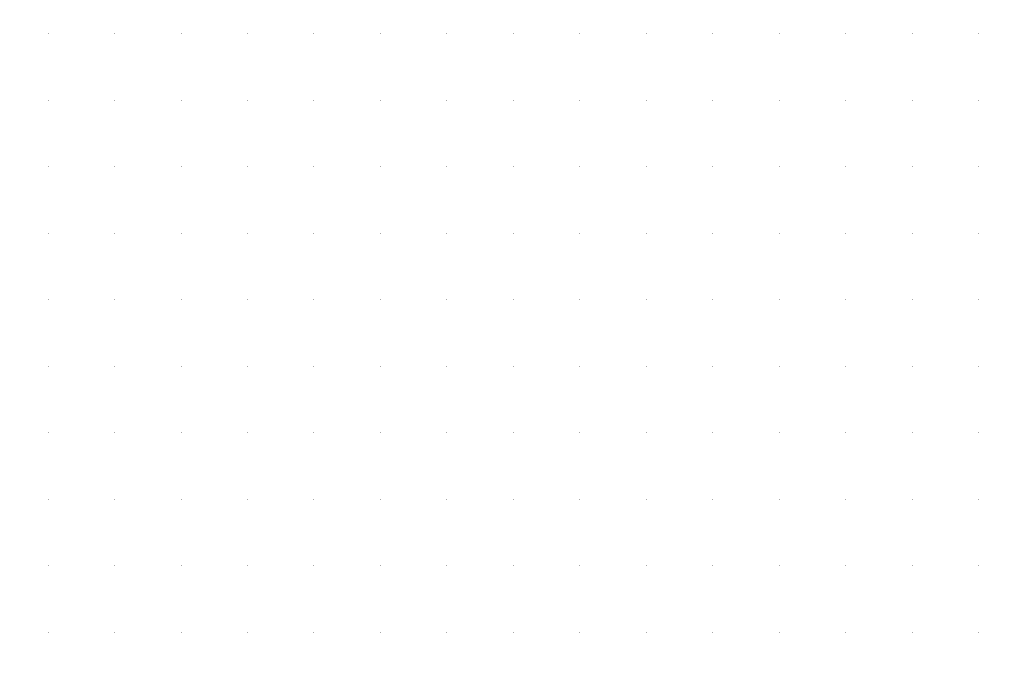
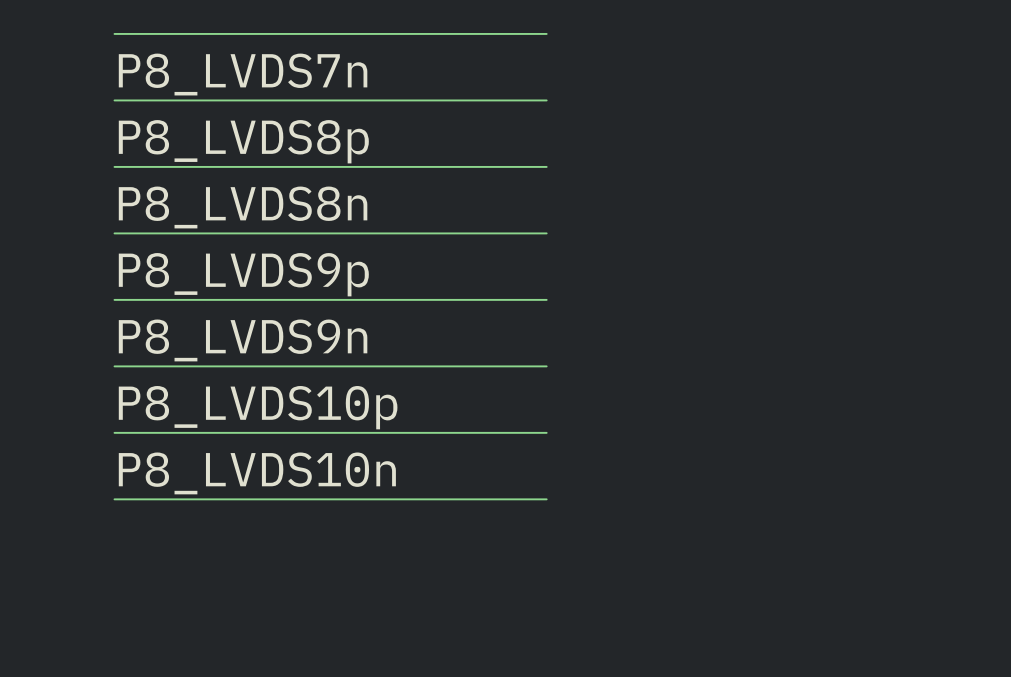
wire: none -> (114, 33) (546, 33)
label: none -> P8_LVDS7n (243, 74)
wire: none -> (114, 100) (546, 100)
label: none -> P8_LVDS8p (243, 141)
wire: none -> (114, 166) (546, 166)
label: none -> P8_LVDS8n (243, 207)
wire: none -> (114, 233) (546, 233)
label: none -> P8_LVDS9p (243, 274)
wire: none -> (114, 299) (546, 299)
label: none -> P8_LVDS9n (243, 340)
wire: none -> (114, 366) (546, 366)
label: none -> P8_LVDS10p (258, 407)
wire: none -> (114, 432) (546, 432)
label: none -> P8_LVDS10n (257, 473)
wire: none -> (114, 499) (546, 499)

